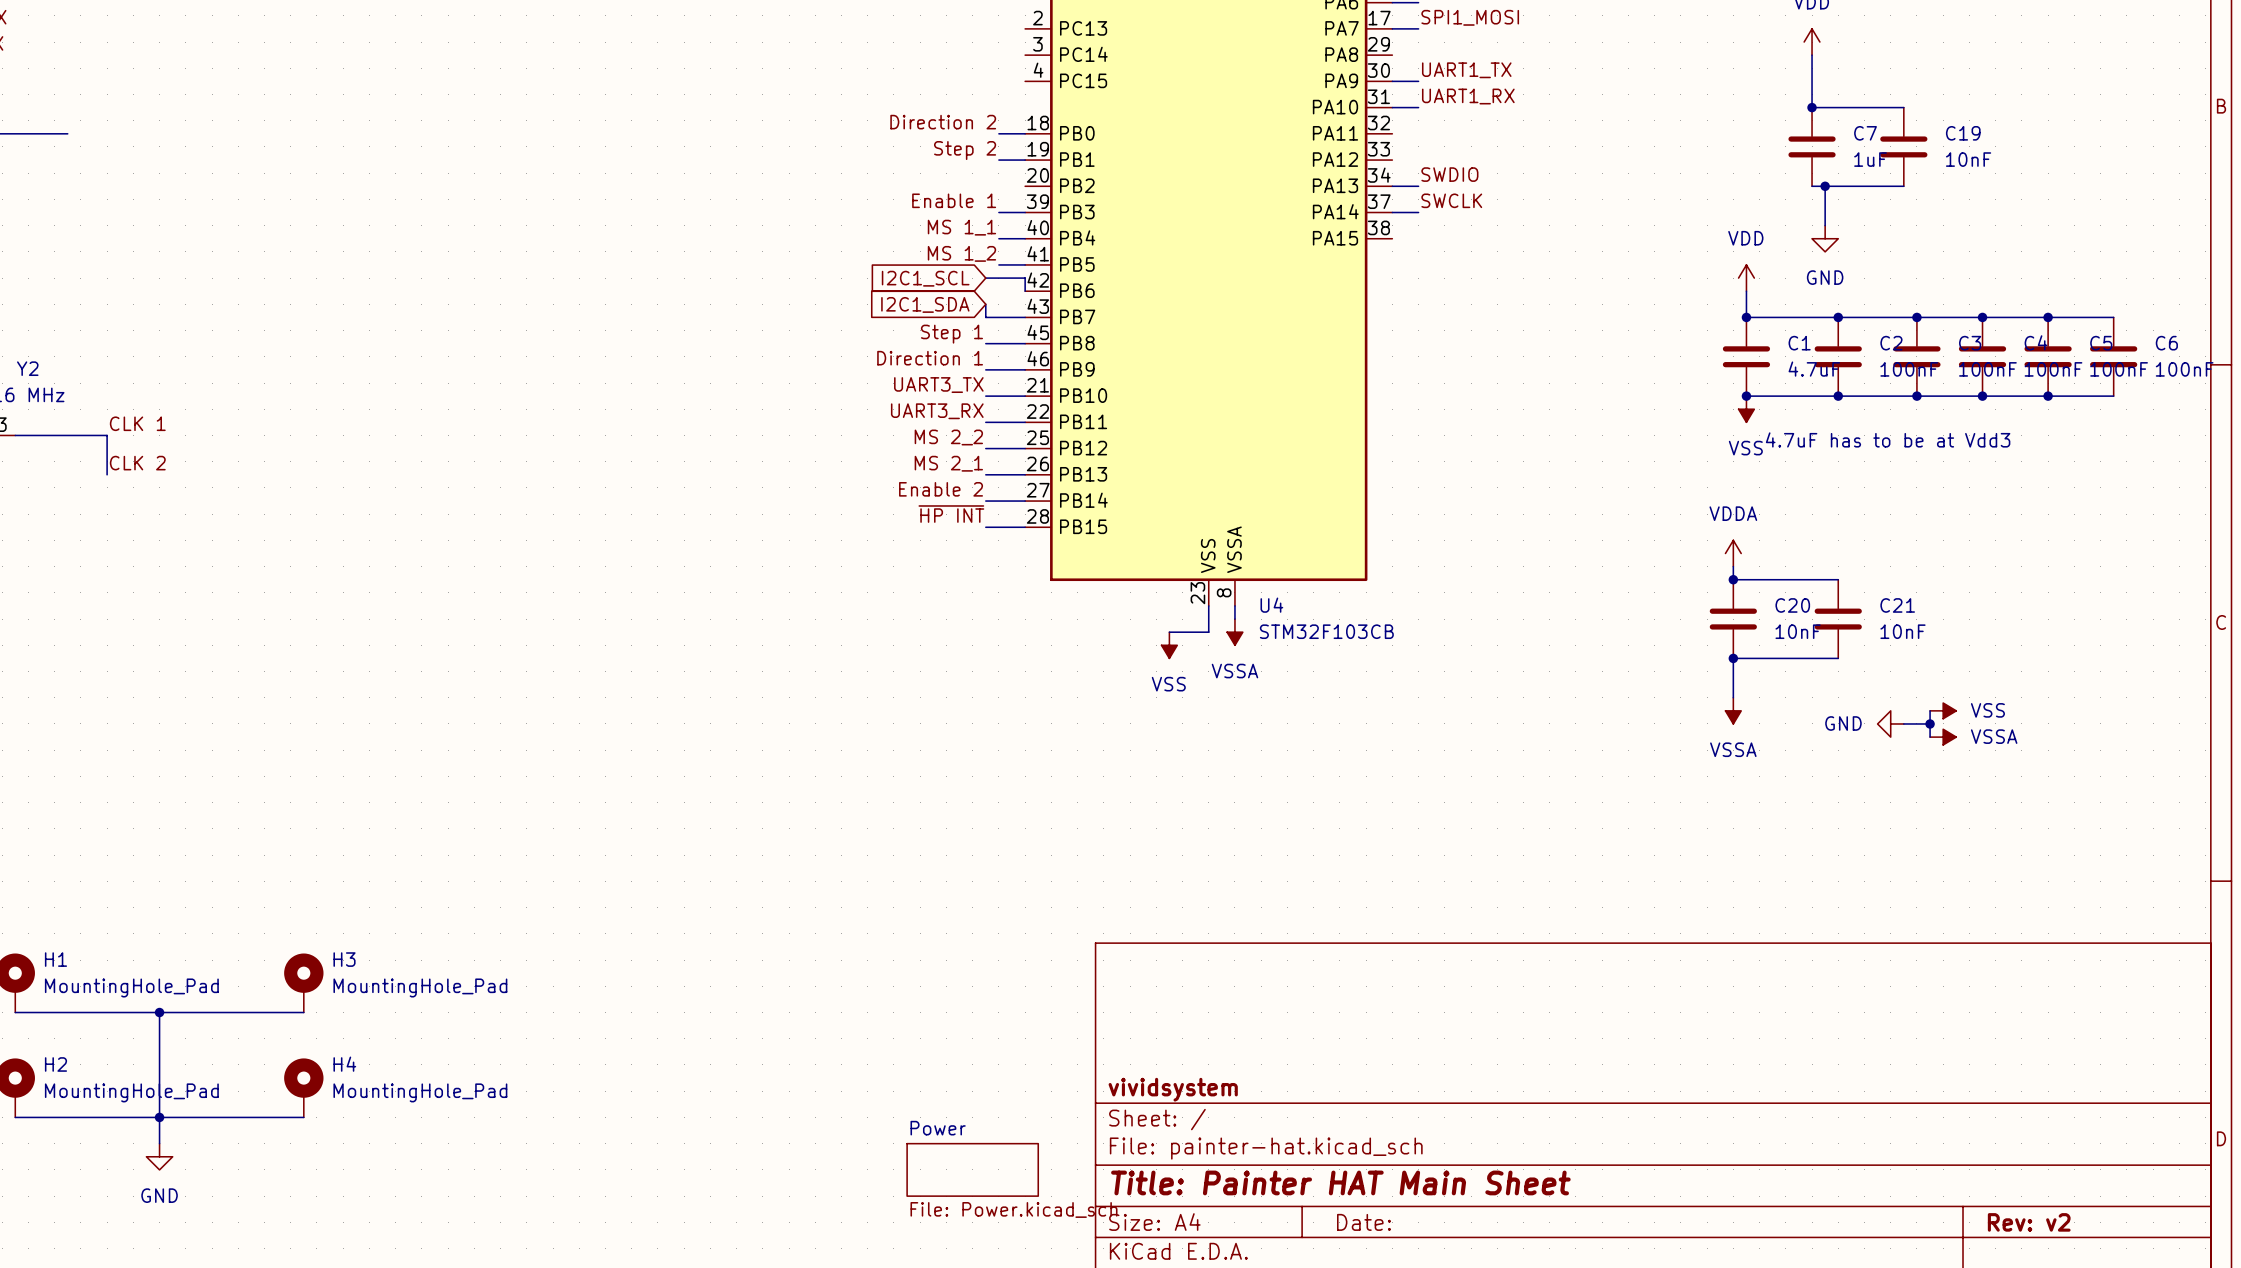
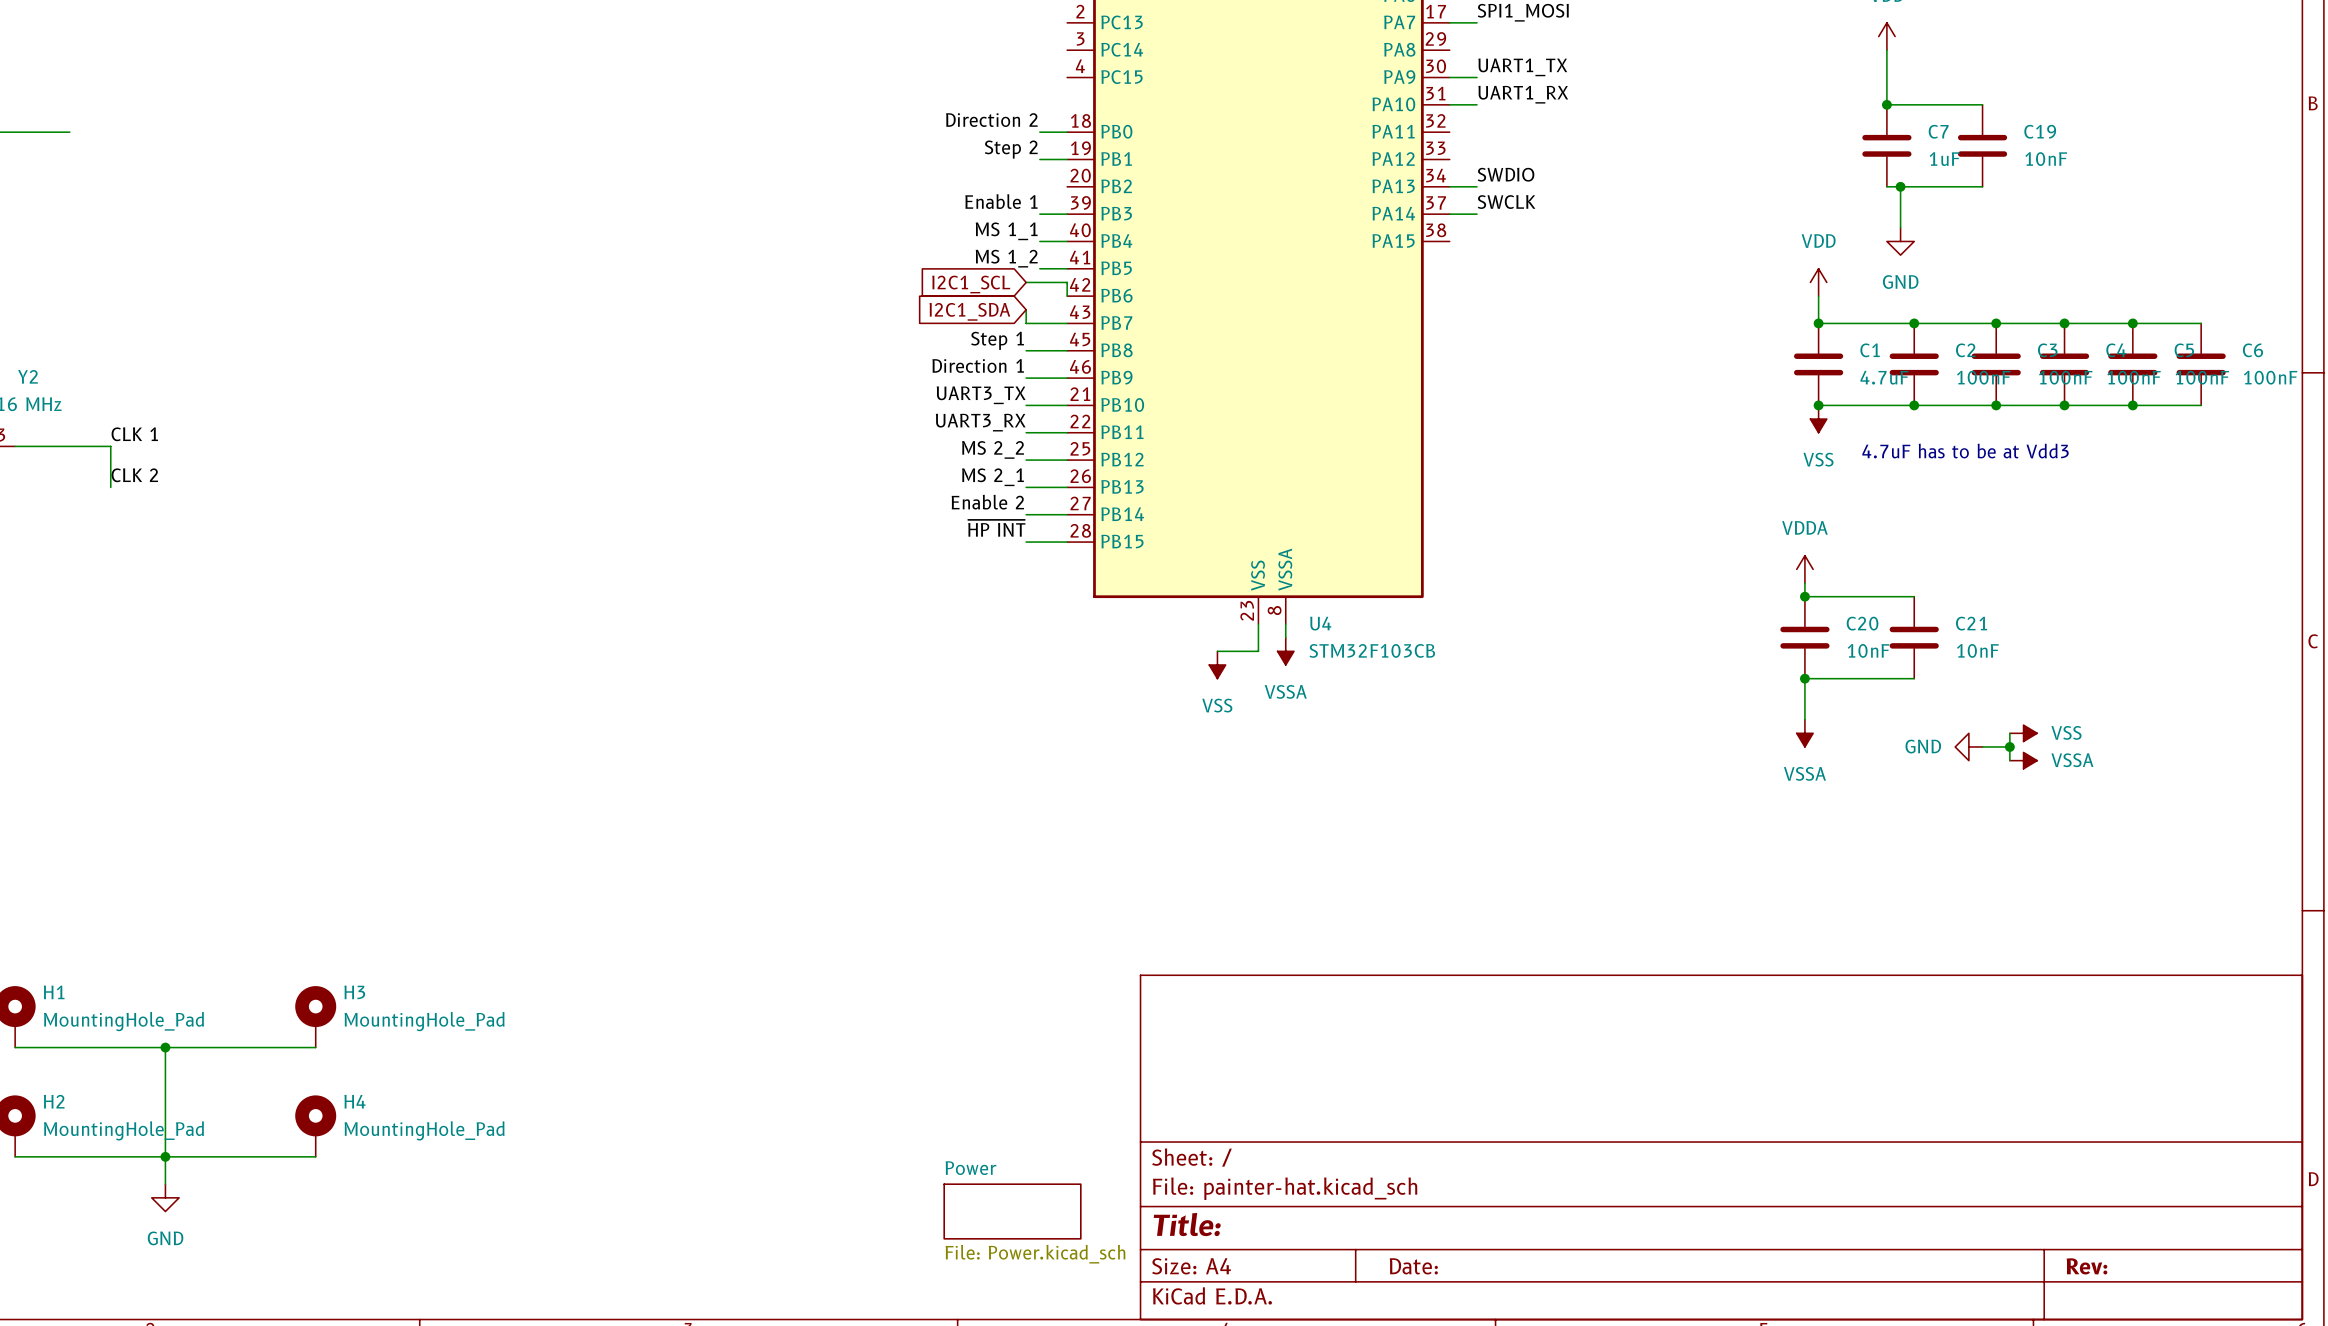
title block: vividsystem (1173, 1089) -> none
title block: Title: Painter HAT Main Sheet (1340, 1182) -> Title: (1187, 1224)
title block: Rev: v2 (2029, 1222) -> Rev: (2086, 1266)

